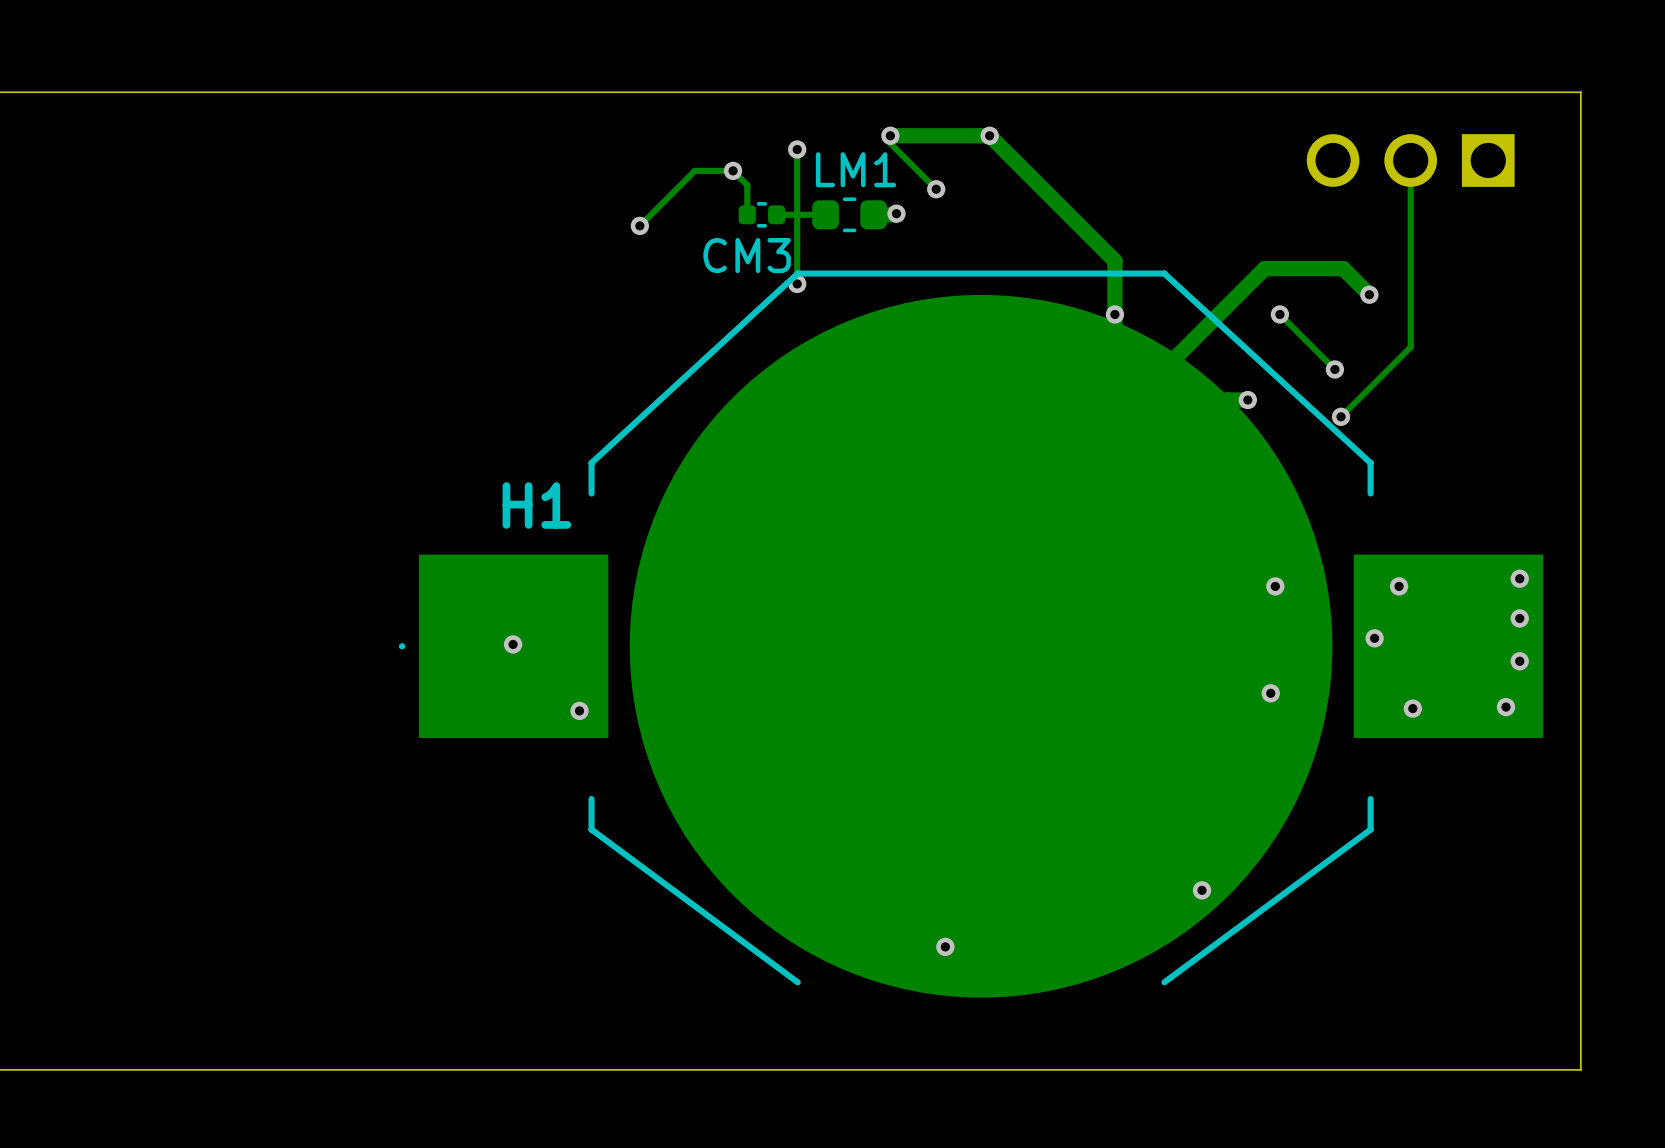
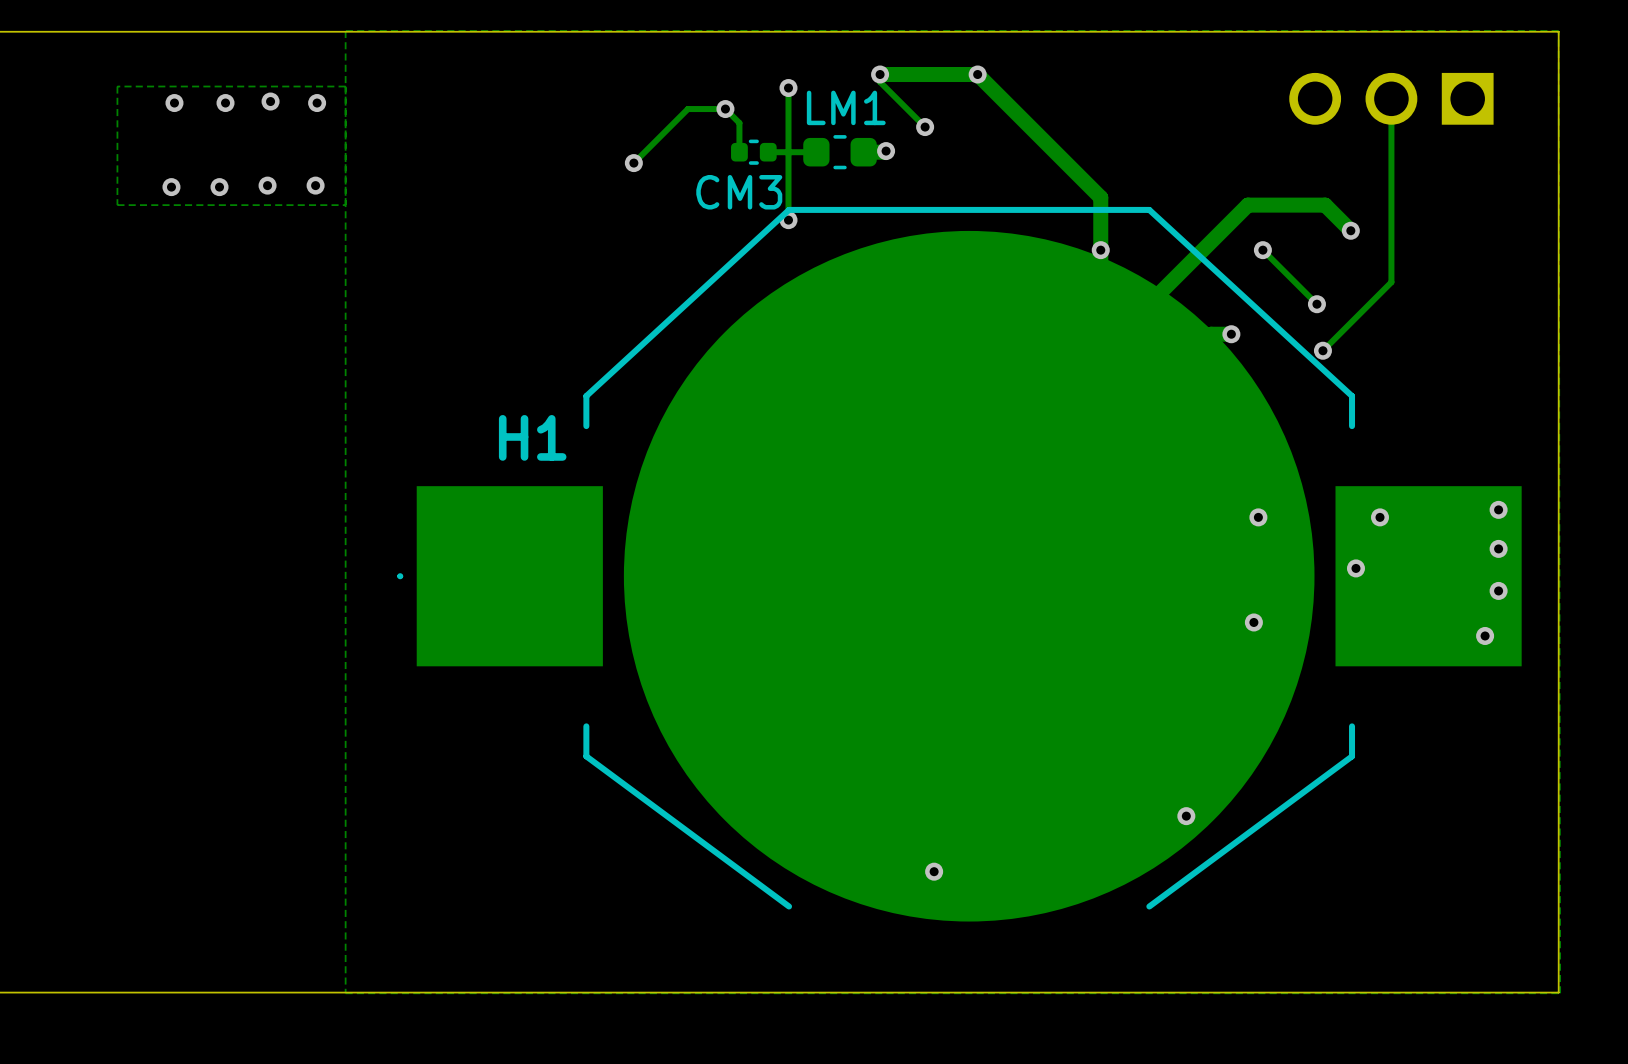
zone outline: none -> (1558, 30) (345, 30) (345, 993) (1560, 993) (1558, 30)
zone outline: none -> (345, 86) (117, 86) (117, 205) (345, 205)
via: none -> (270, 101)
via: none -> (174, 103)
via: none -> (225, 103)
via: none -> (317, 103)
via: none -> (267, 185)
via: none -> (315, 185)
via: none -> (171, 187)
via: none -> (219, 187)
via: (513, 644) -> none
via: (1412, 708) -> none
via: (579, 710) -> none

